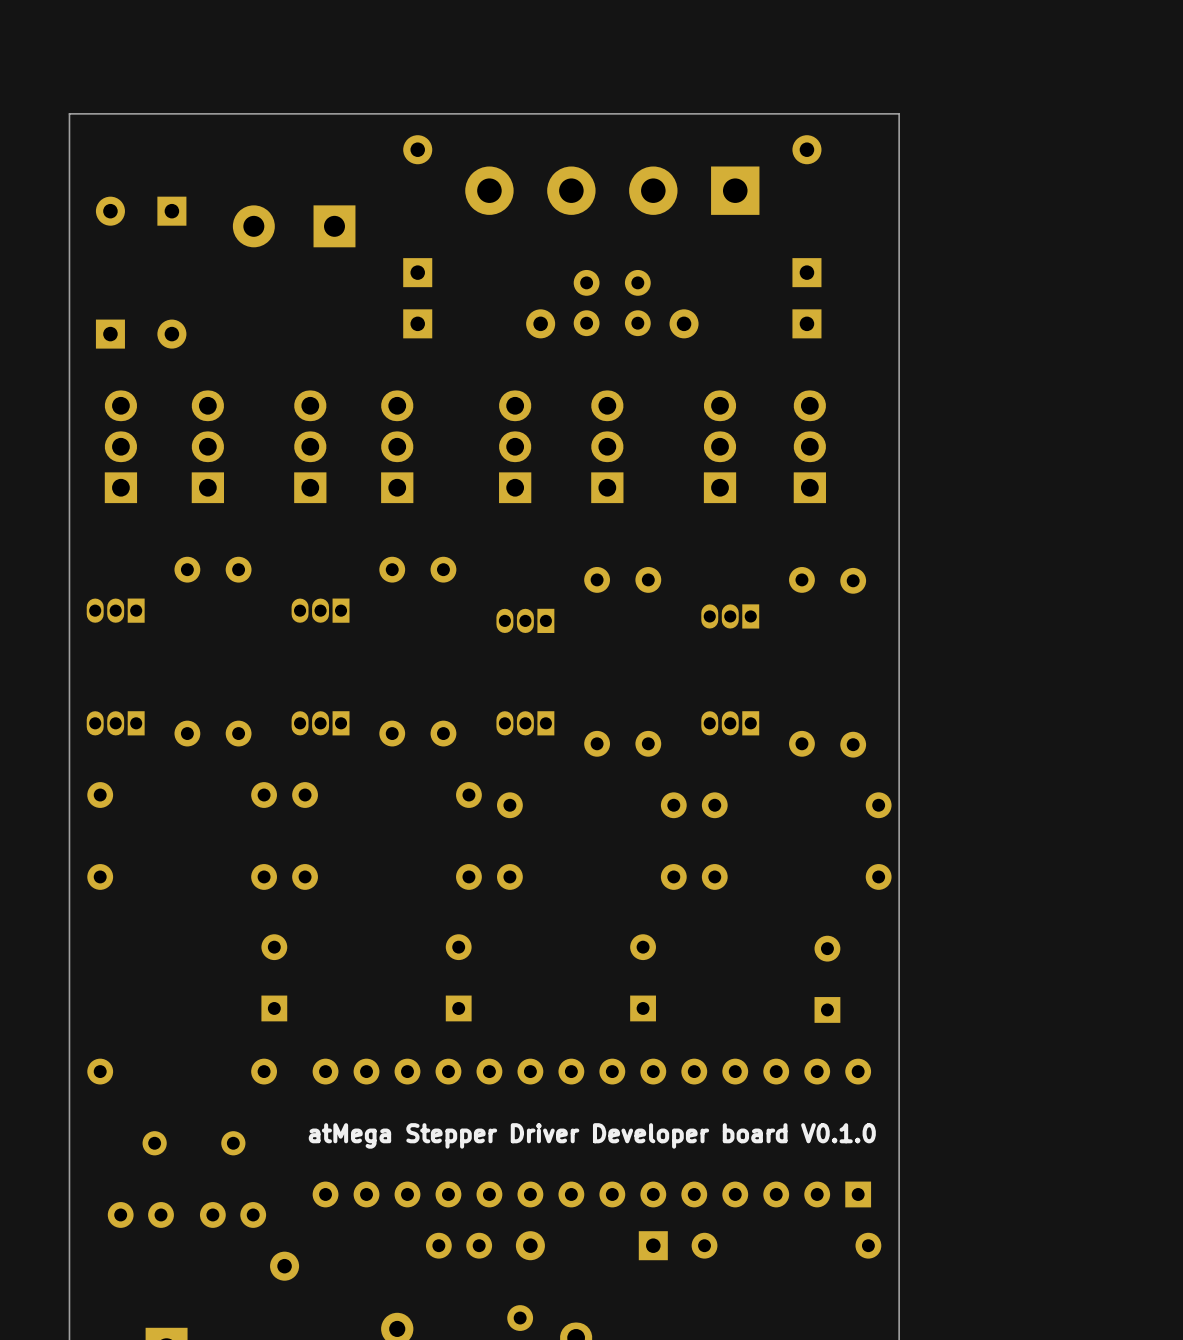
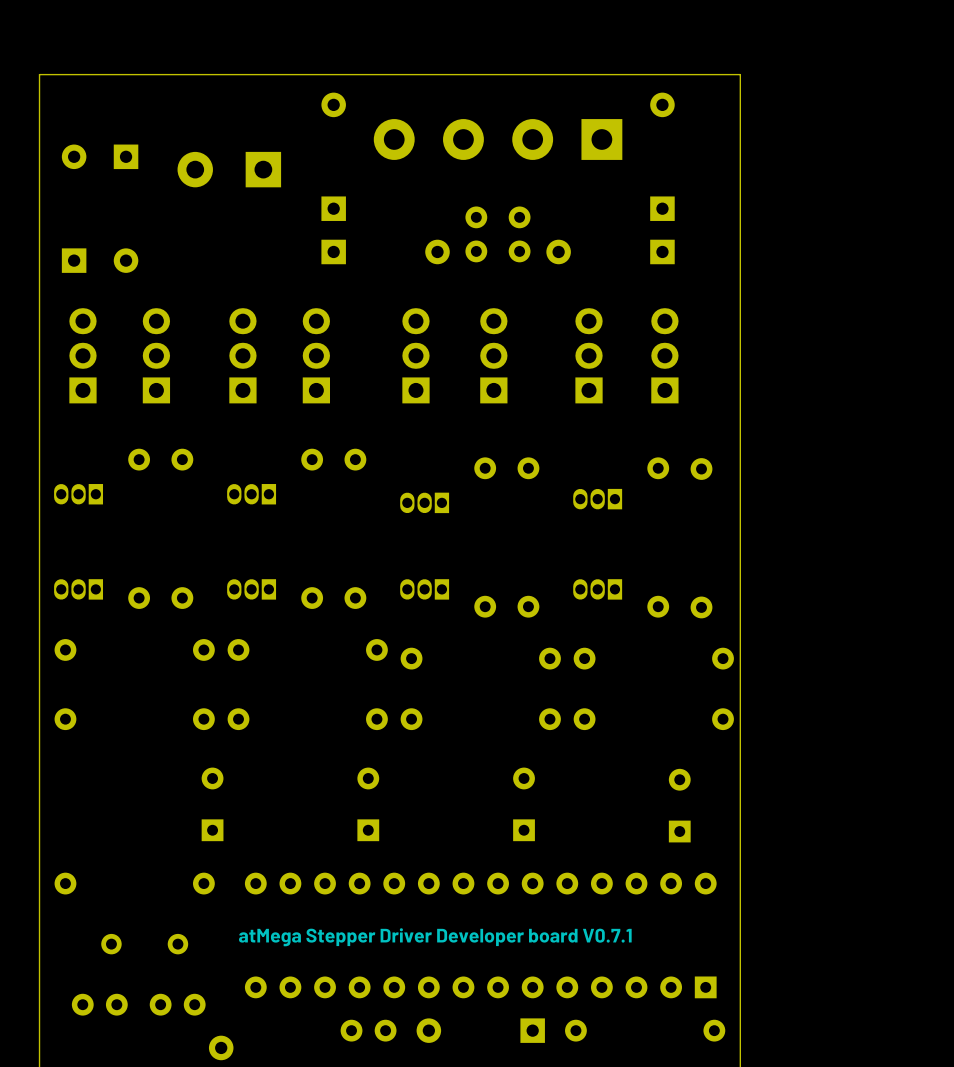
text: atMega Stepper Driver Developer board V0.1.0 (592, 1135) -> atMega Stepper Driver Developer board V0.7.1 (435, 937)

